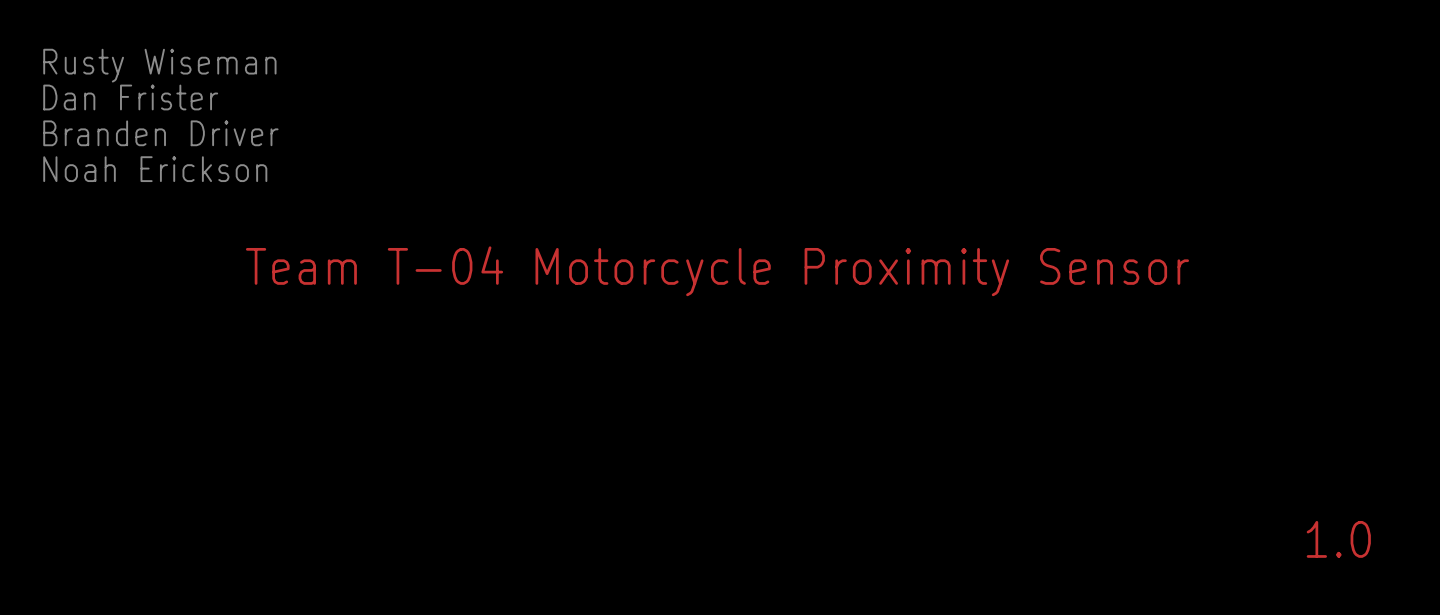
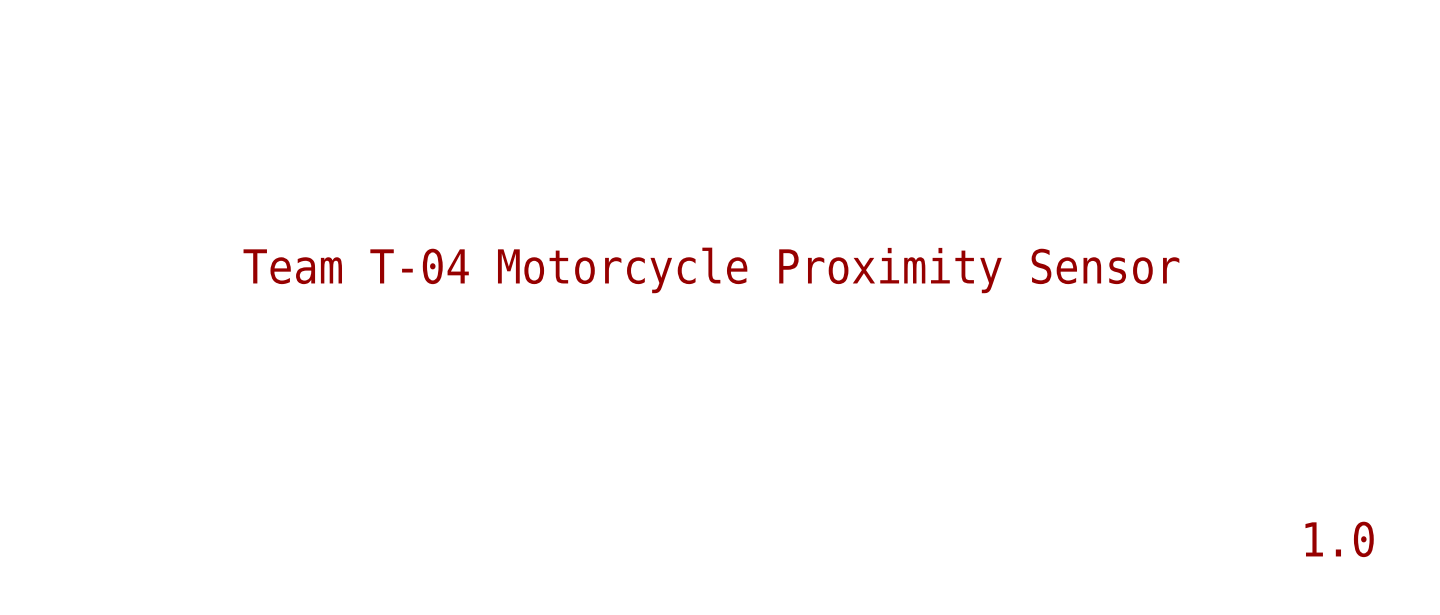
text: Rusty Wiseman (159, 65) -> none
text: Dan Frister (130, 97) -> none
text: Branden Driver (160, 133) -> none
text: Noah Erickson (155, 169) -> none

